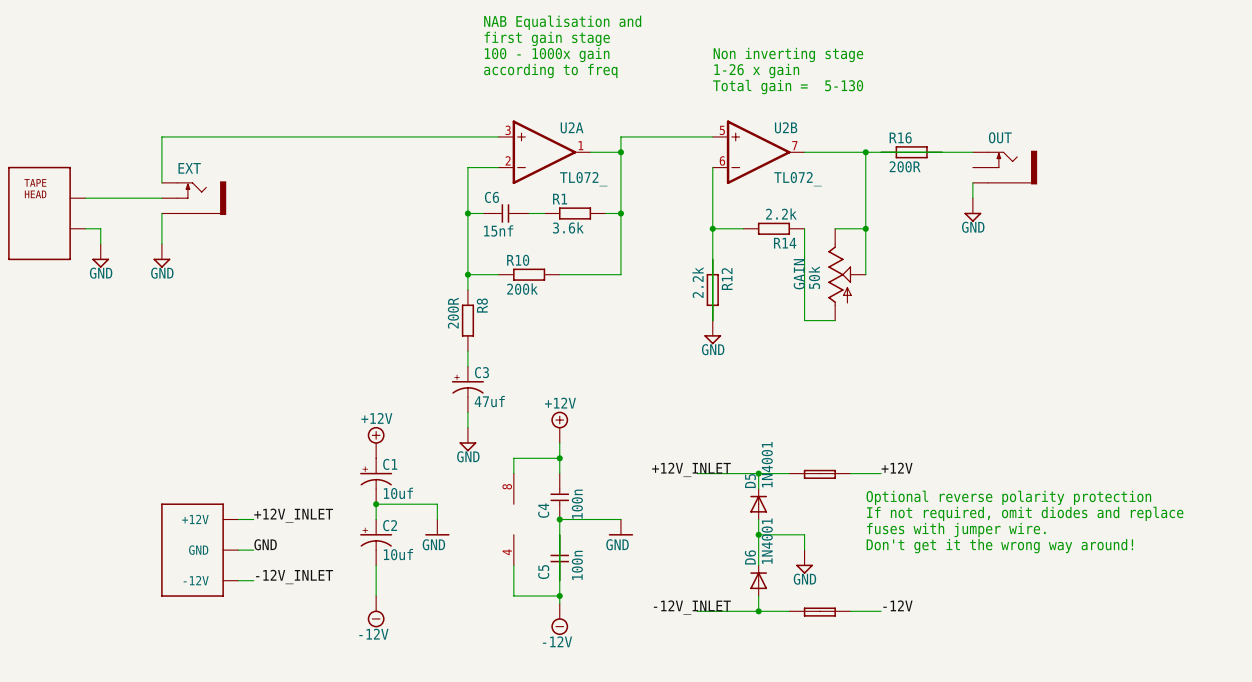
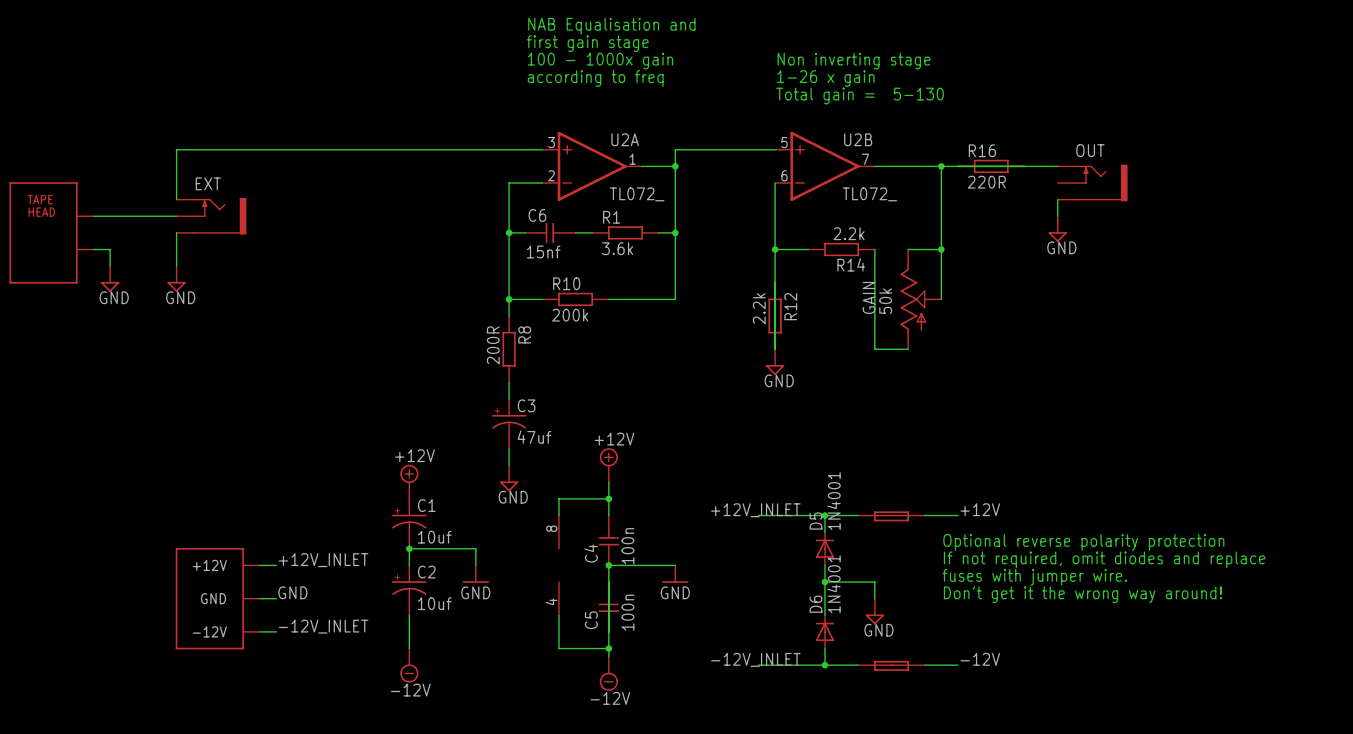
R16 value: 200R (905, 166) -> 220R (986, 182)

